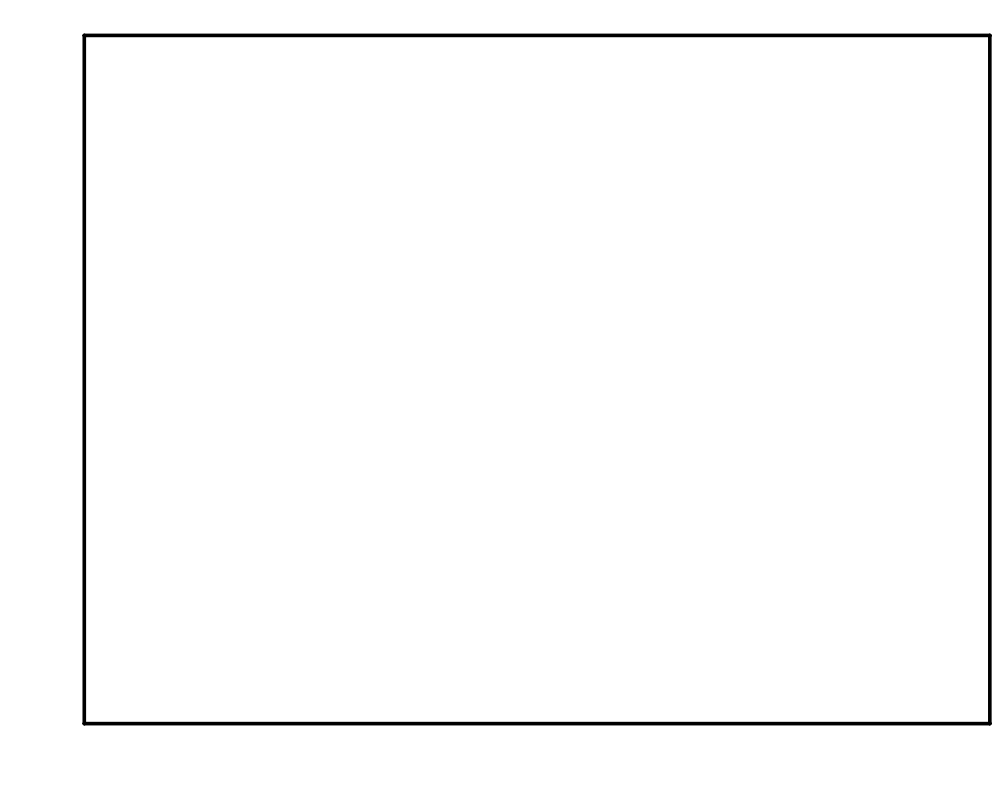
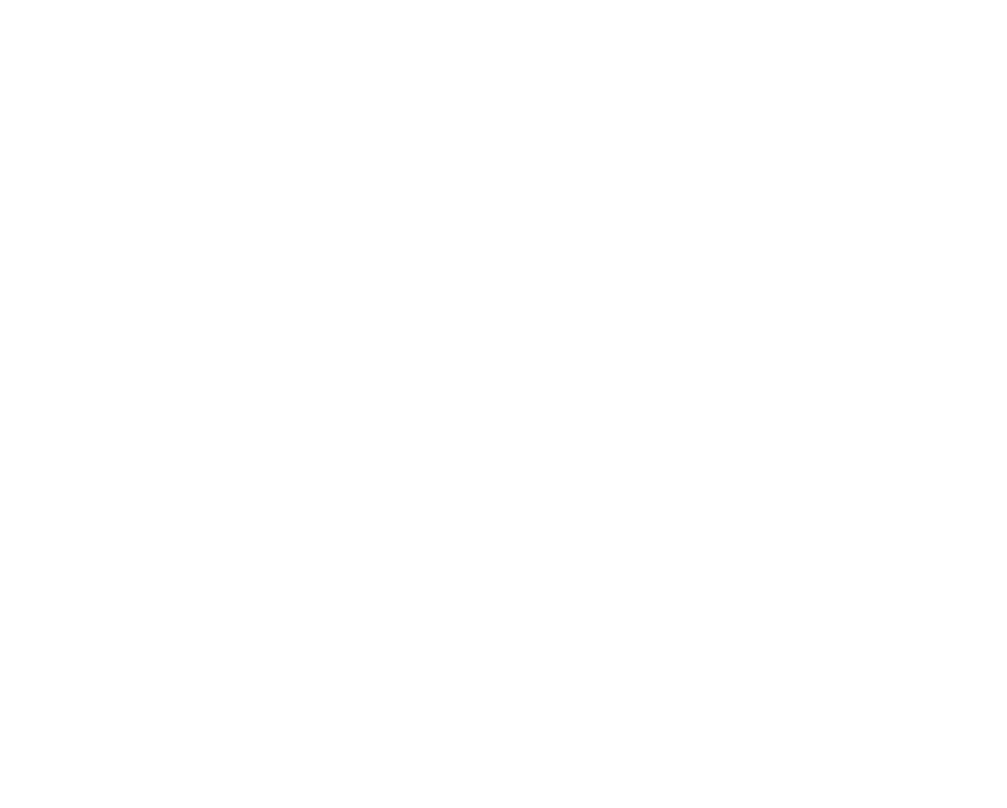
board edge: (989, 35) (84, 35) (84, 723) (989, 723) (989, 35) -> none

